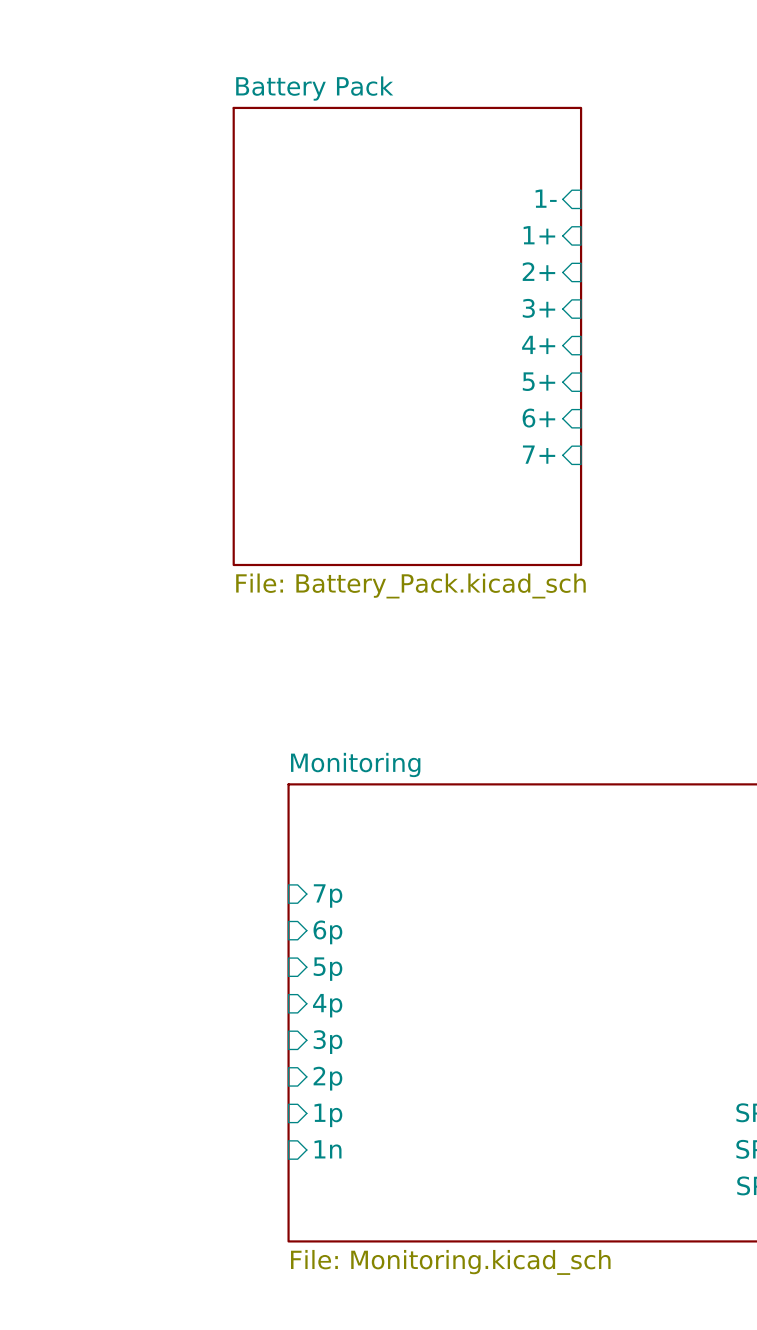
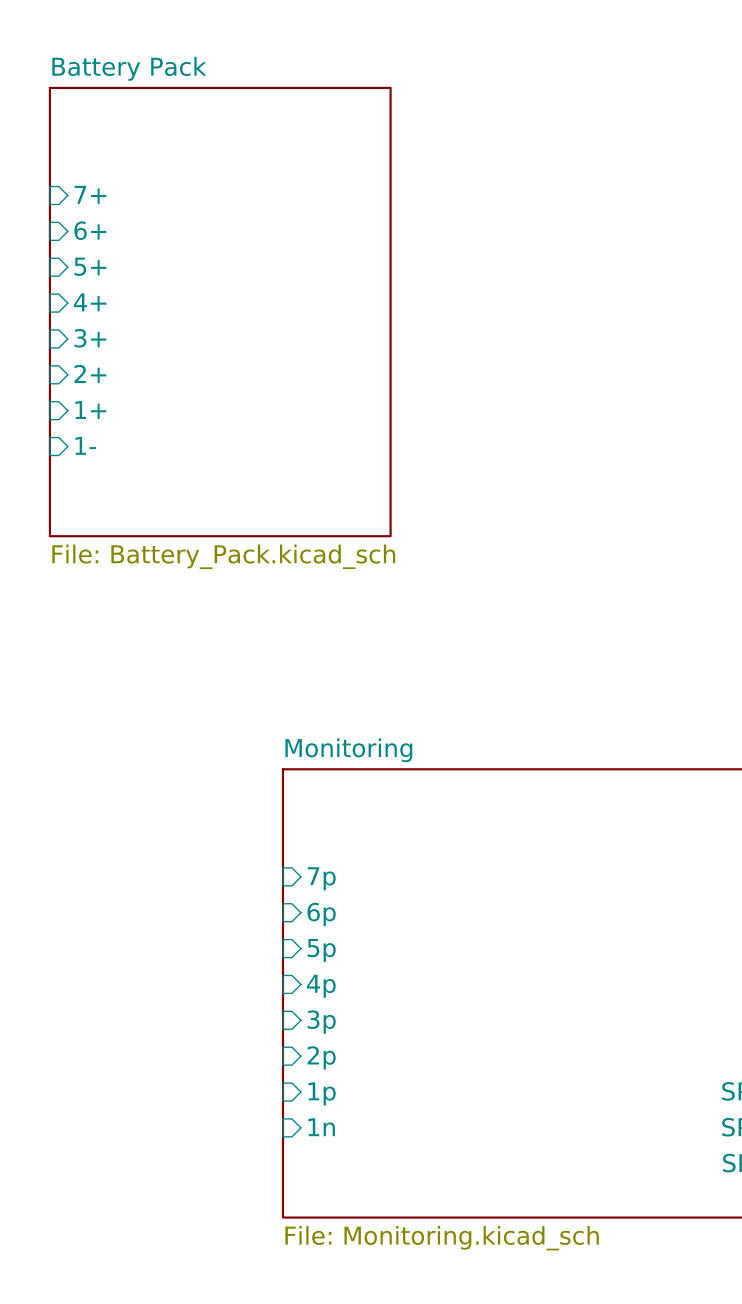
sheet pin: none -> 7+ (90, 194)
sheet pin: 1- (546, 198) -> none
sheet pin: none -> 6+ (90, 230)
sheet pin: 1+ (539, 235) -> none
sheet pin: none -> 5+ (90, 266)
sheet pin: 2+ (538, 271) -> none
sheet pin: none -> 4+ (90, 302)
sheet pin: 3+ (539, 308) -> none
sheet Battery Pack position: (407, 336) -> (220, 312)
sheet pin: none -> 3+ (90, 338)
sheet pin: 4+ (538, 344) -> none
sheet pin: none -> 2+ (90, 373)
sheet pin: 5+ (539, 381) -> none
sheet pin: none -> 1+ (90, 410)
sheet pin: 6+ (538, 418) -> none
sheet pin: none -> 1- (85, 445)
sheet pin: 7+ (539, 454) -> none

